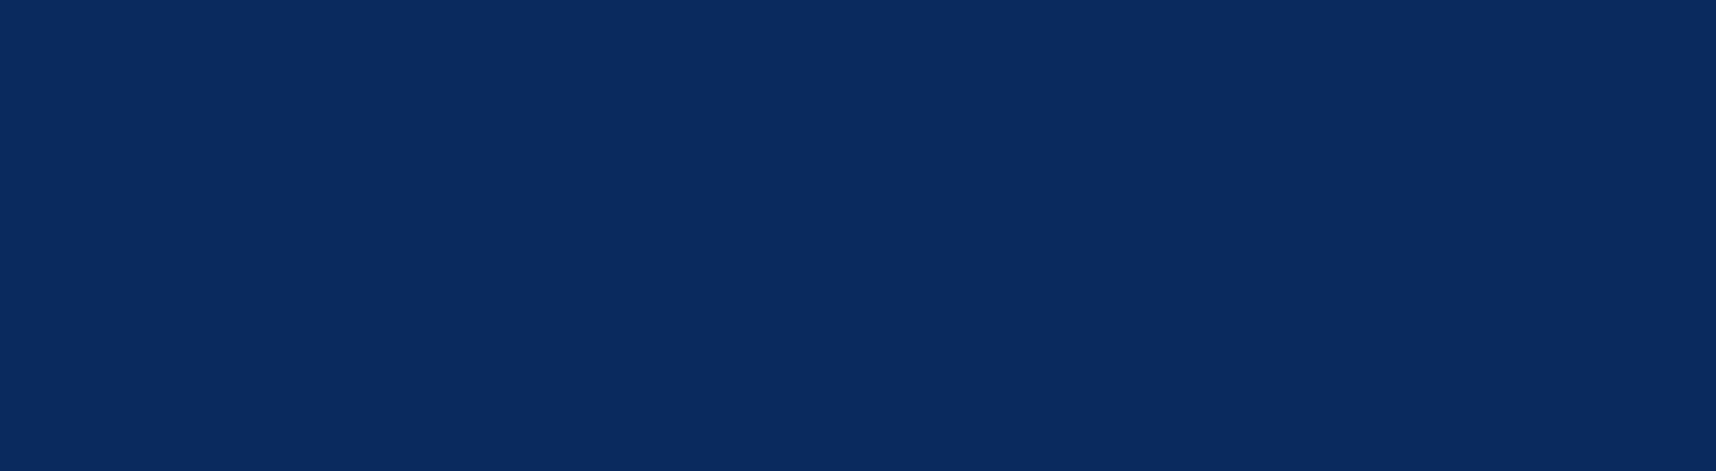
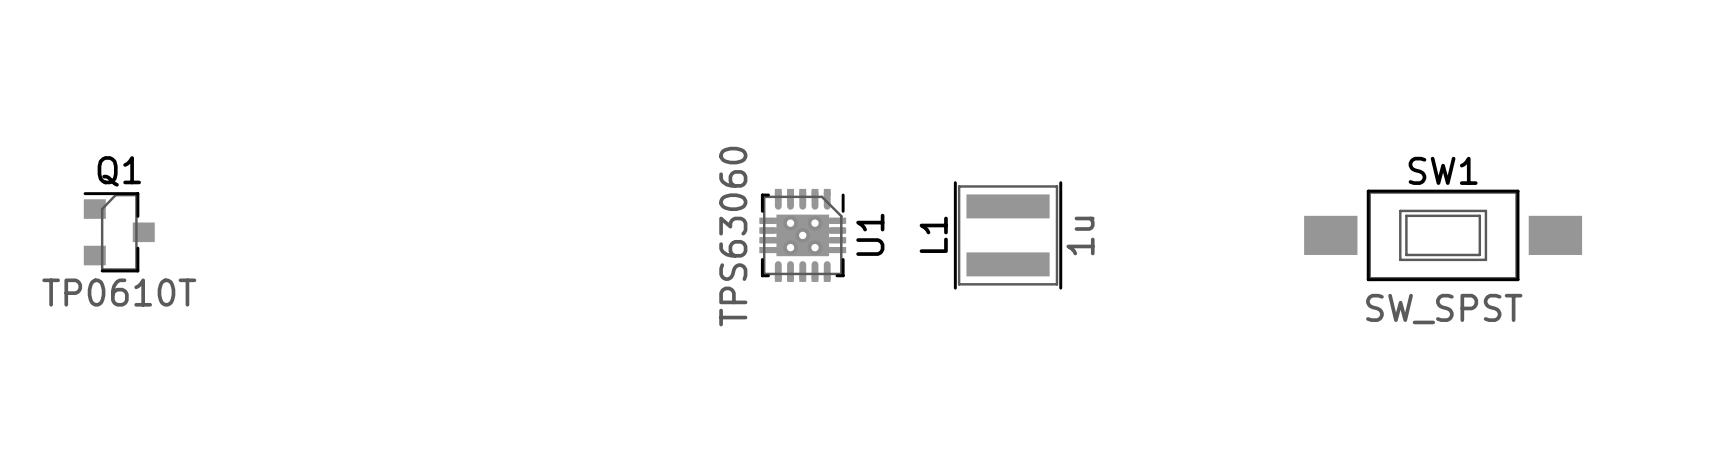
Q1: none -> TP0610T (119, 232)
U1: none -> TPS63060 (802, 235)
L1: none -> 1u (1008, 235)
SW1: none -> SW_SPST (1443, 235)

